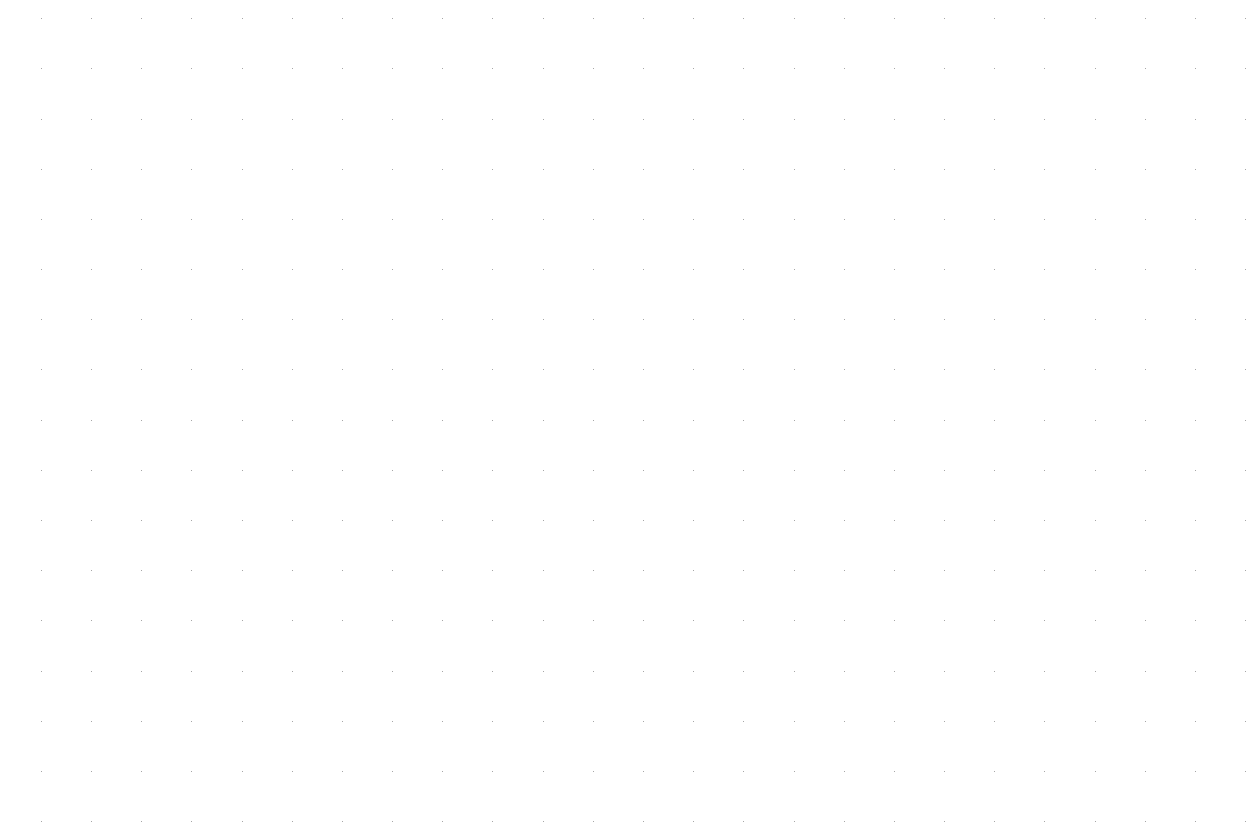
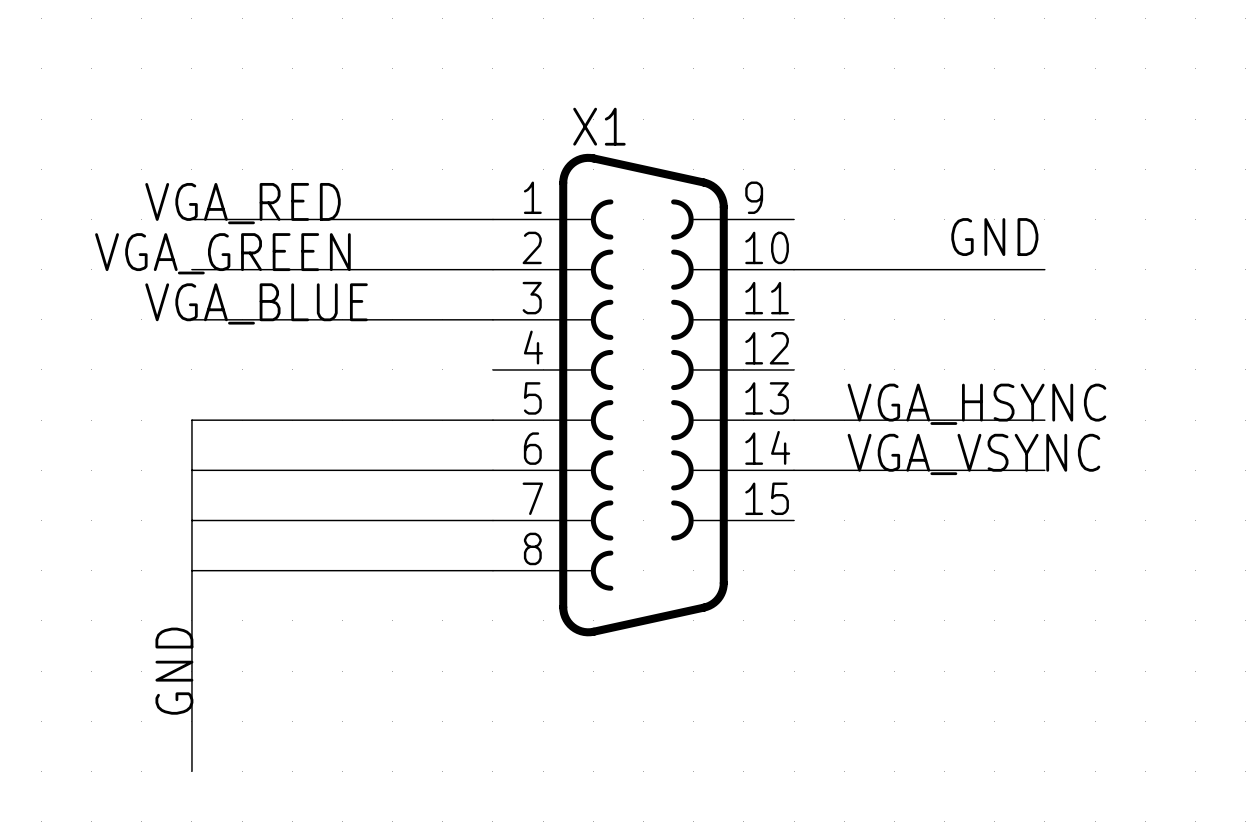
label: none -> VGA_RED (242, 203)
wire: none -> (191, 219) (492, 219)
label: none -> GND (994, 237)
label: none -> VGA_GREEN (222, 253)
wire: none -> (191, 269) (492, 269)
wire: none -> (794, 269) (1044, 269)
label: none -> VGA_BLUE (256, 303)
wire: none -> (191, 319) (492, 319)
X1: none -> (643, 395)
label: none -> VGA_HSYNC (976, 404)
wire: none -> (492, 420) (191, 420) (191, 771)
wire: none -> (794, 420) (1044, 420)
label: none -> VGA_VSYNC (973, 454)
wire: none -> (191, 470) (492, 470)
wire: none -> (794, 470) (1044, 470)
wire: none -> (191, 520) (492, 520)
wire: none -> (191, 570) (492, 570)
label: none -> GND (174, 671)

